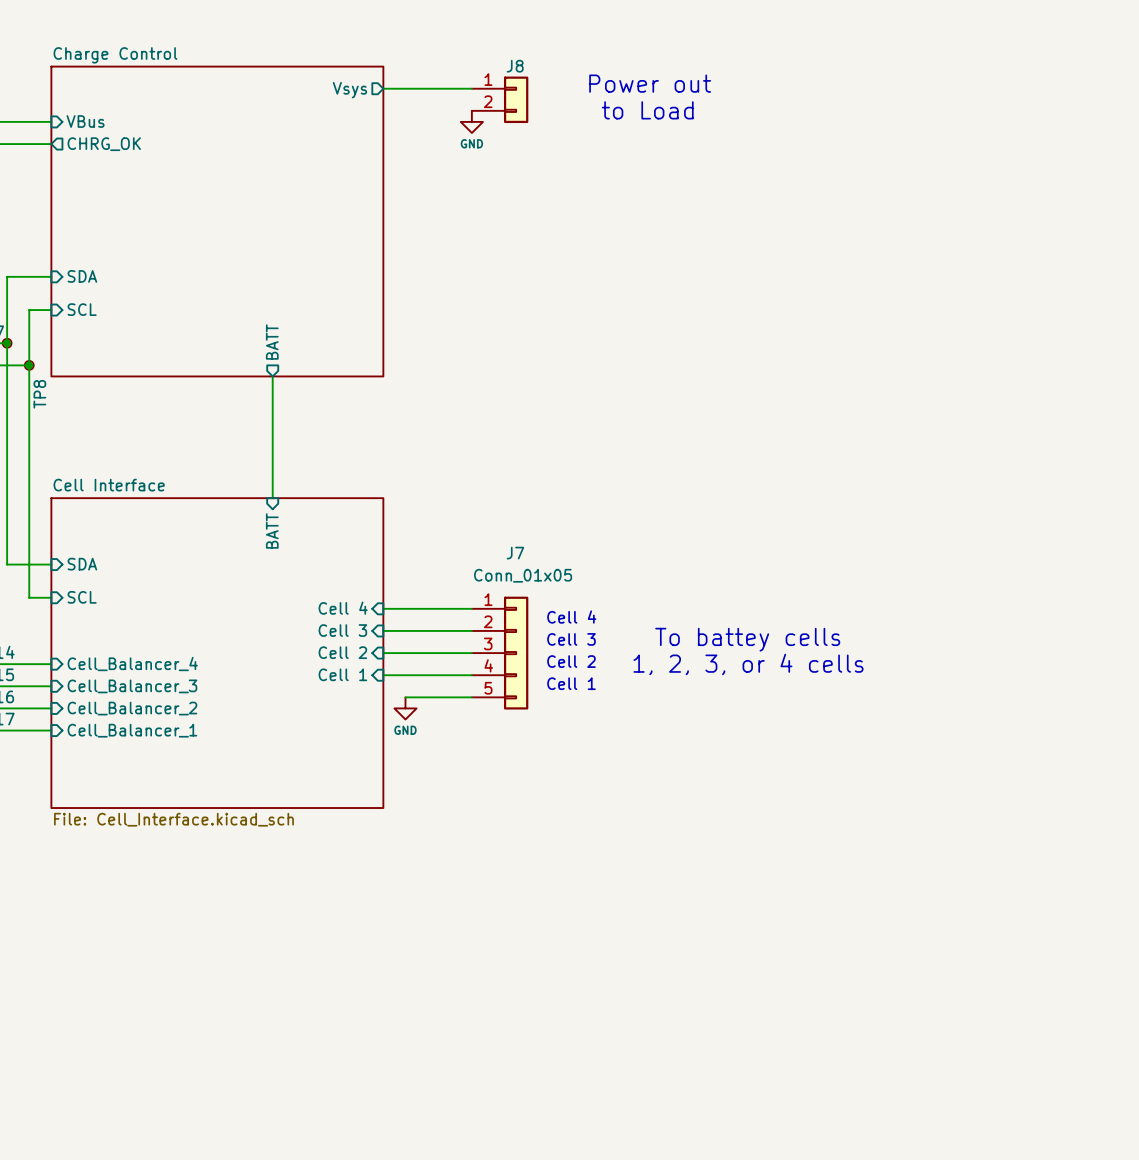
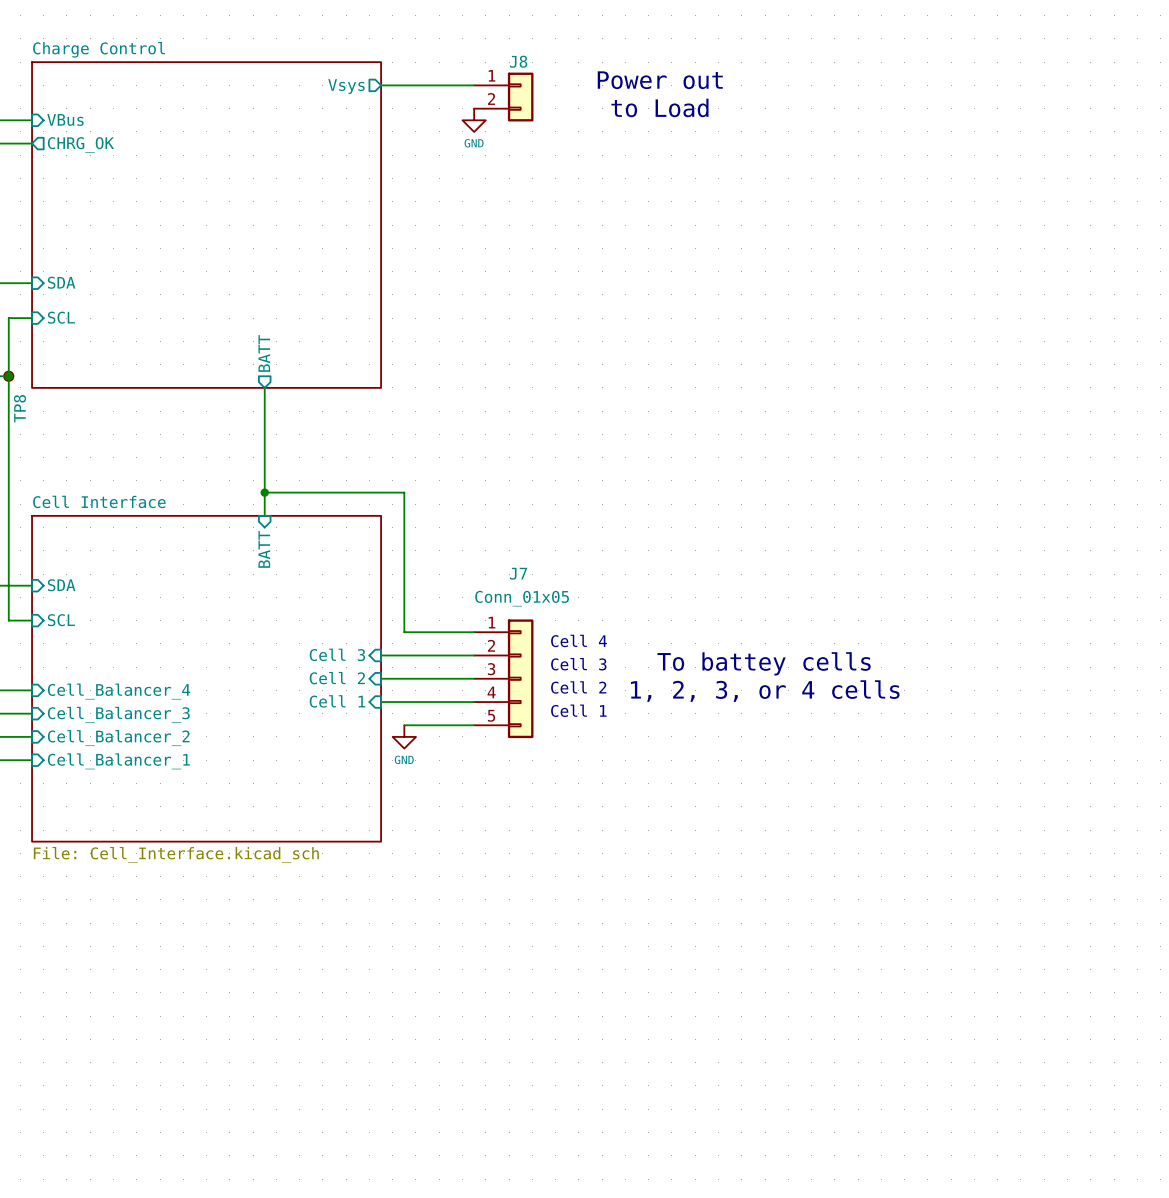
junction: none -> (264, 492)
sheet pin: Cell 4 (343, 608) -> none
wire: (383, 608) (405, 608) -> (264, 492) (404, 492) (404, 632)

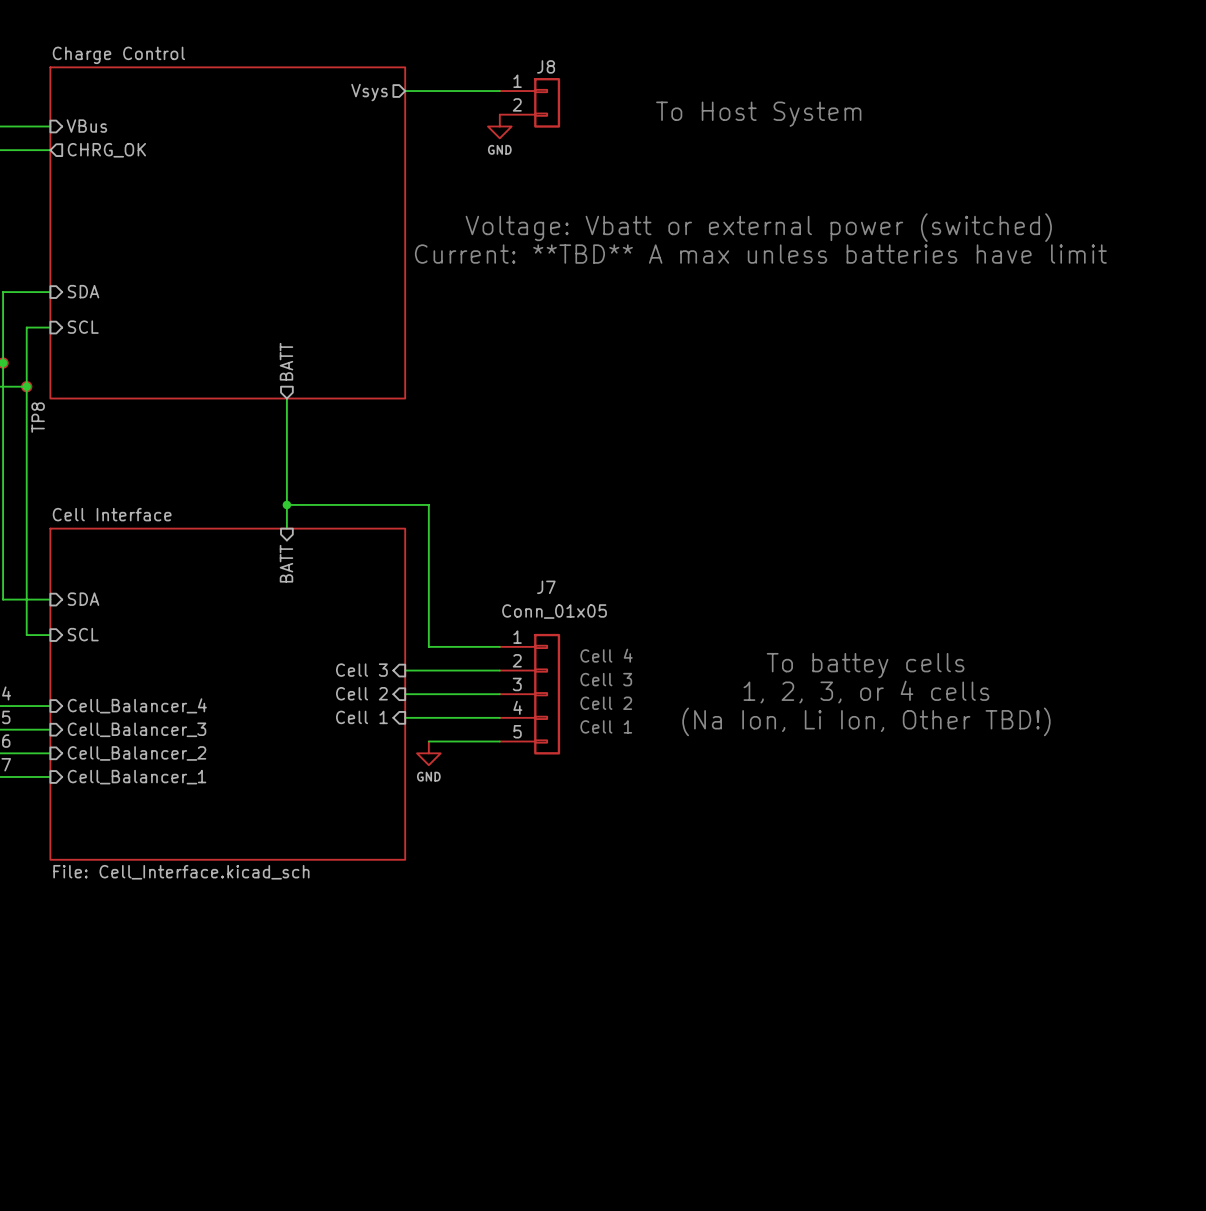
text: Power out (660, 80) -> none
text: to Load (659, 107) -> none
text: none -> To Host System (758, 114)
text: none -> Voltage: Vbatt or external power (switched) (758, 227)
text: none -> Current: **TBD** A max unless batteries have limit (760, 254)
text position: To battey cells (764, 663) -> To battey cells (865, 665)
text position: 1, 2, 3, or 4 cells (765, 691) -> 1, 2, 3, or 4 cells (866, 692)
text: none -> (Na Ion, Li Ion, Other TBD!) (866, 721)

